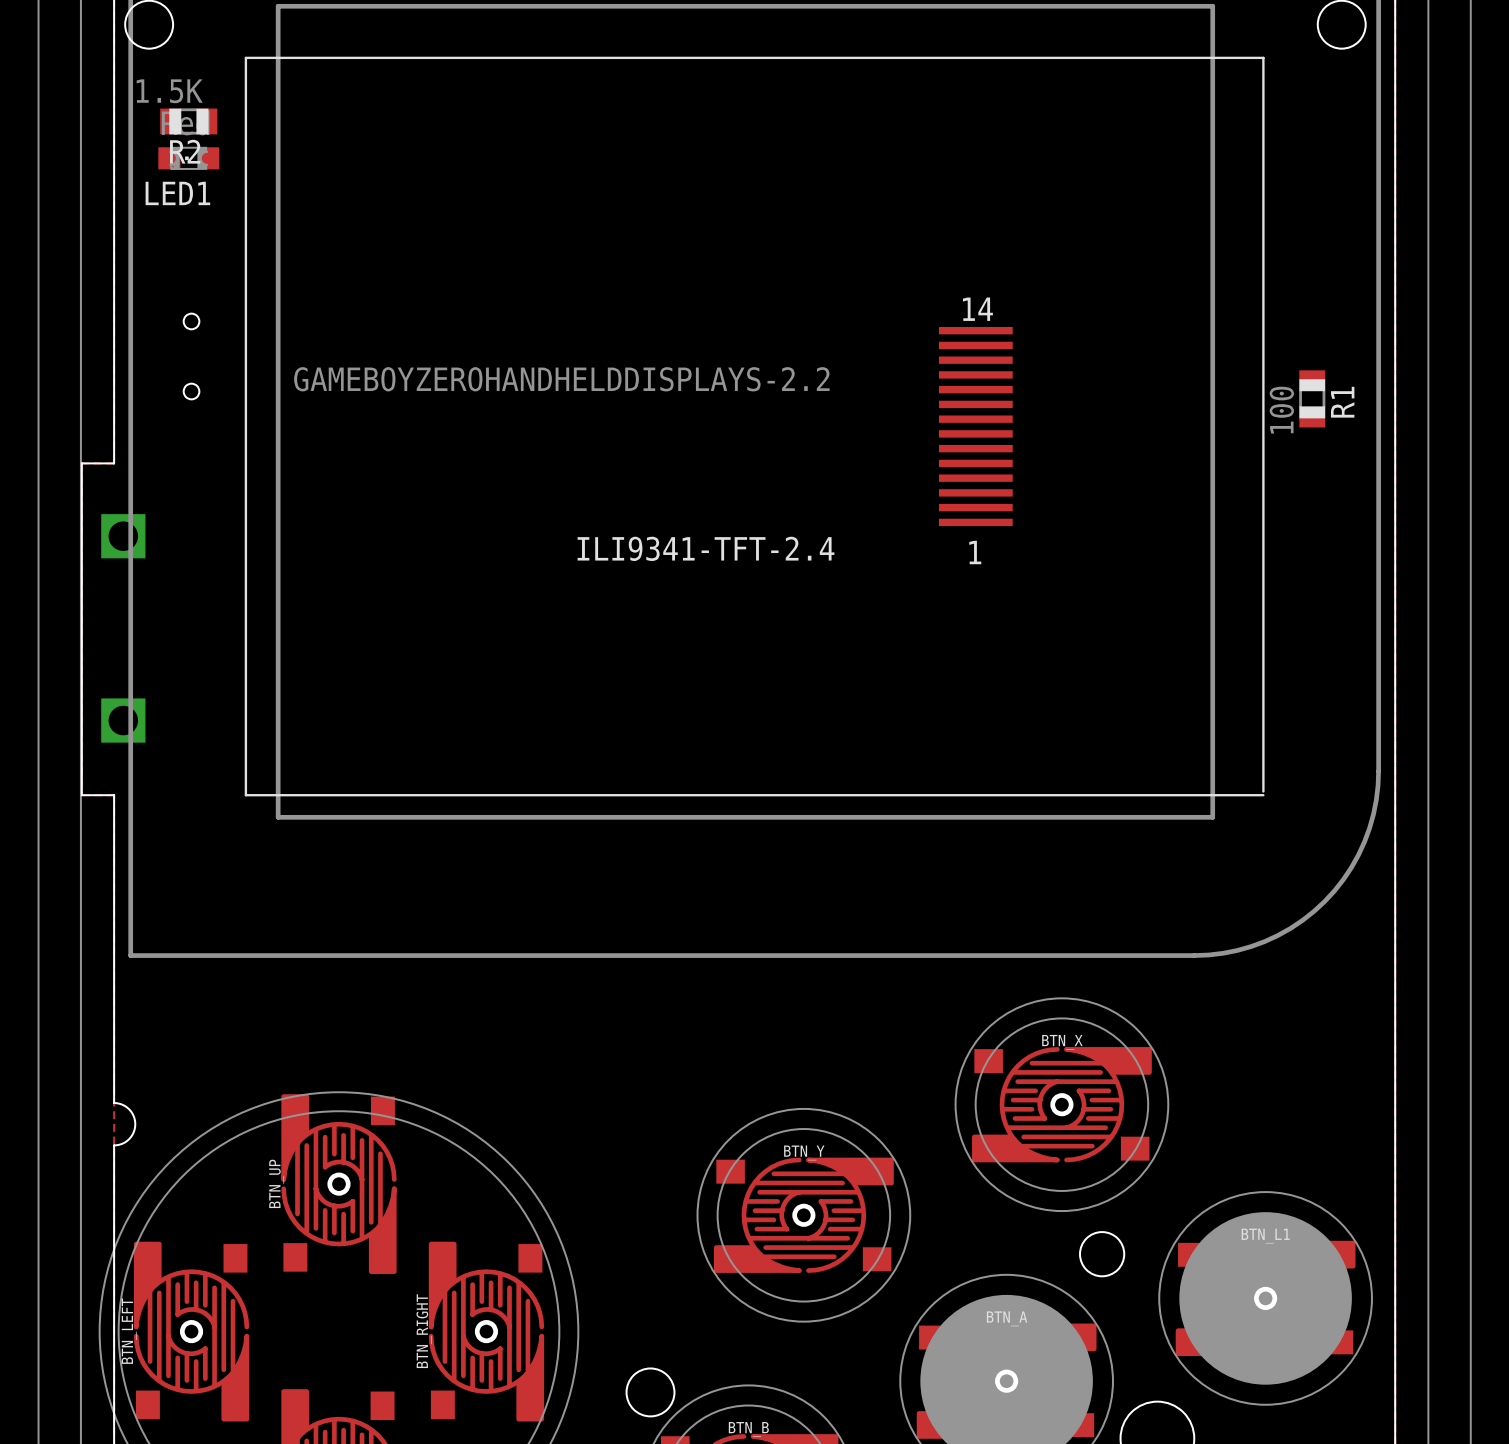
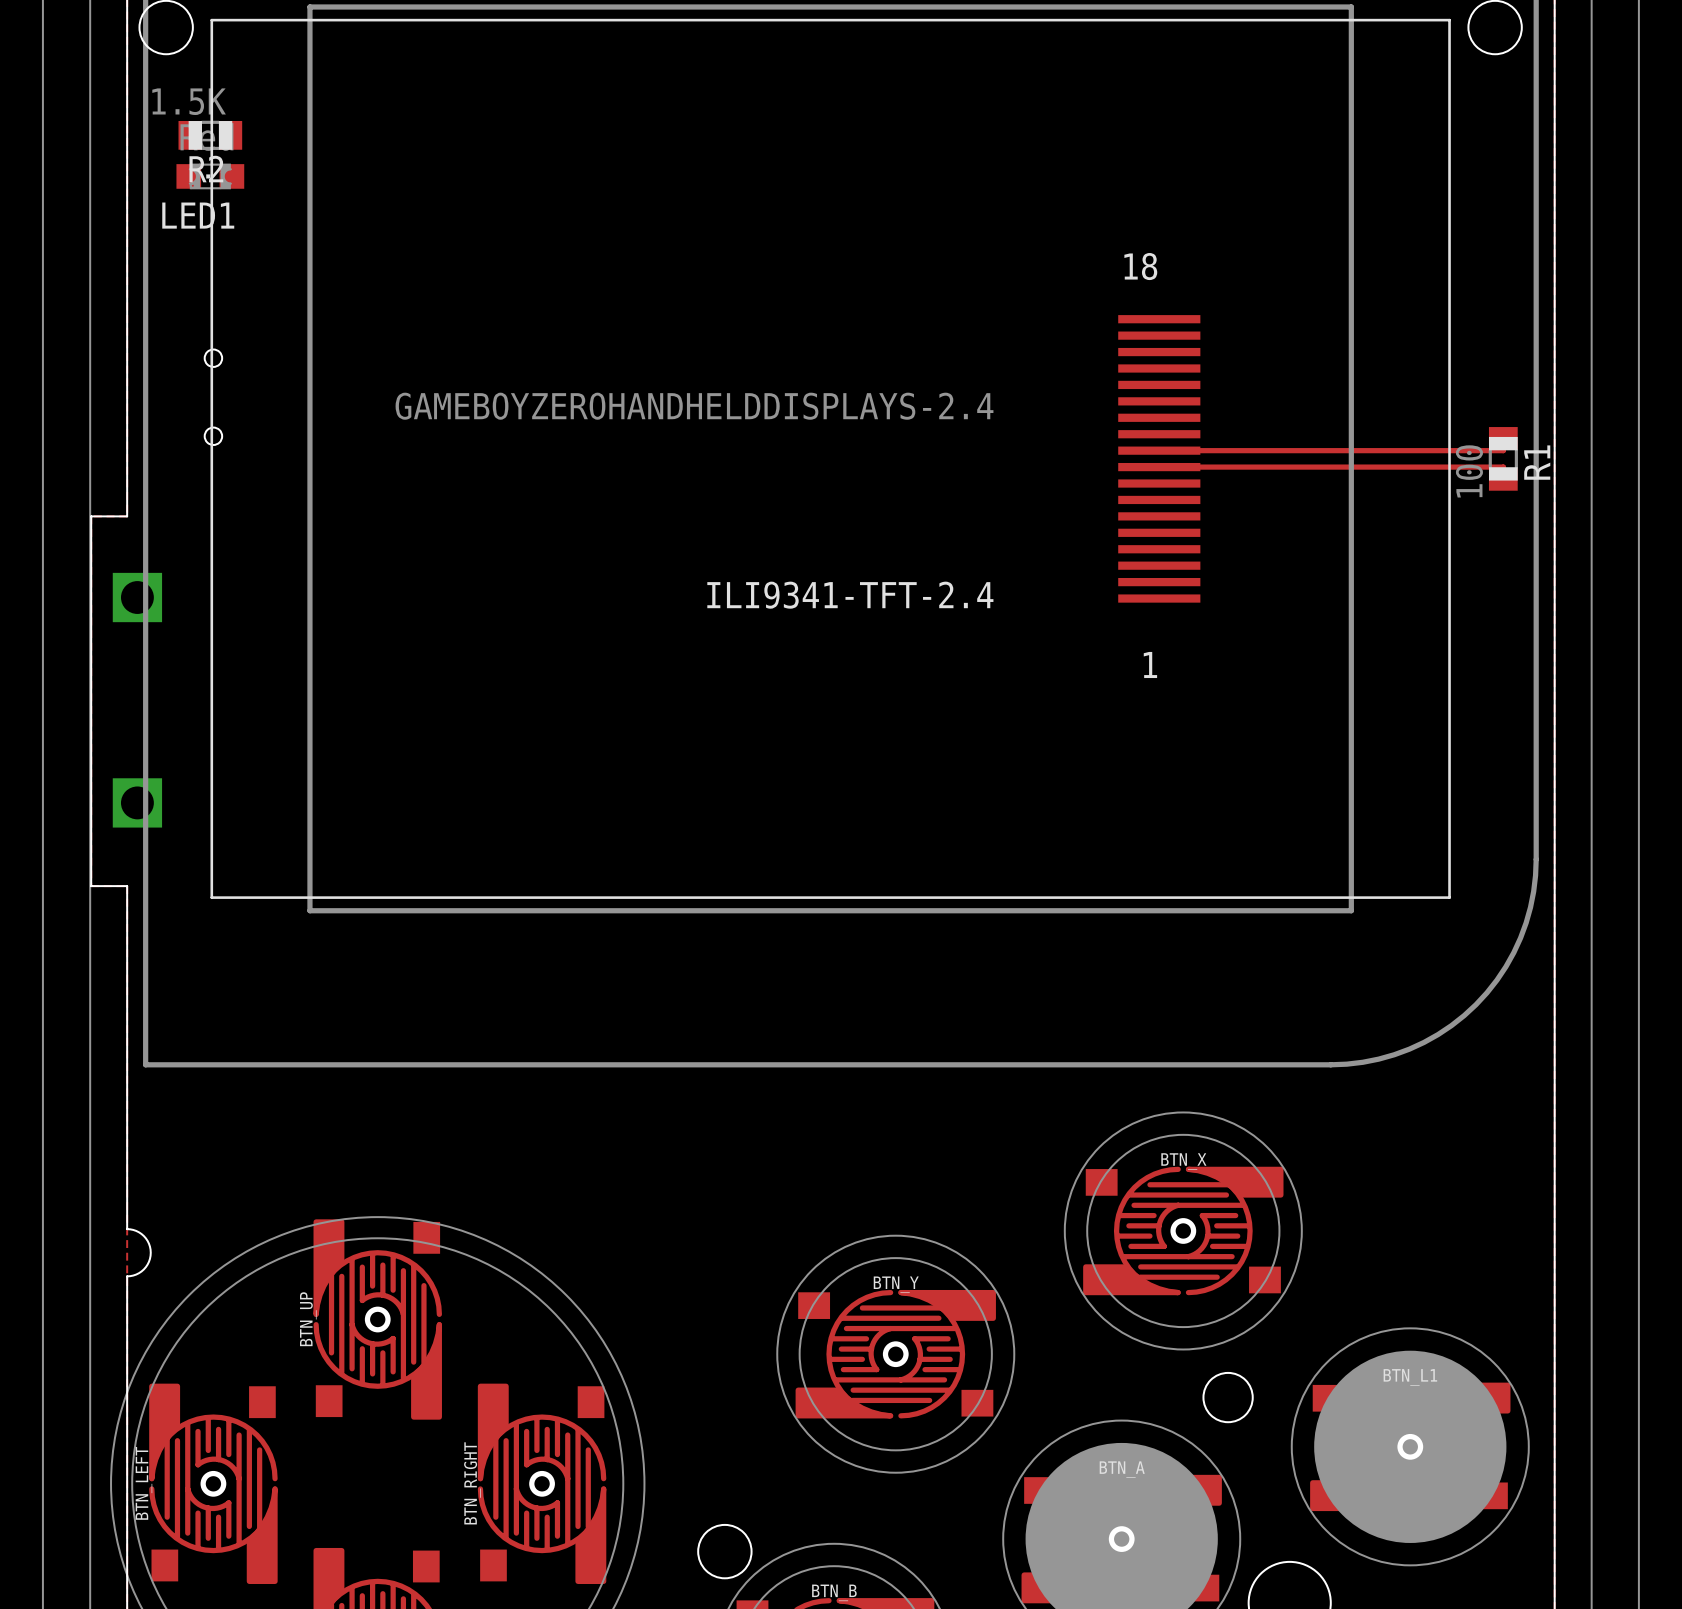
ILI9341-TFT-2.4 footprint: [244, 56, 1265, 797] -> [210, 18, 1451, 899]
ILI9341-TFT-2.4 value: GAMEBOYZEROHANDHELDDISPLAYS-2.2 (561, 379) -> GAMEBOYZEROHANDHELDDISPLAYS-2.4 (694, 406)
track: none -> (1503, 438) (1503, 450) (1159, 450)
R1 position: (1312, 398) -> (1503, 458)
track: none -> (1159, 467) (1503, 467) (1503, 479)
ILI9341-TFT-2.4 name position: ILI9341-TFT-2.4 (705, 548) -> ILI9341-TFT-2.4 (850, 595)

